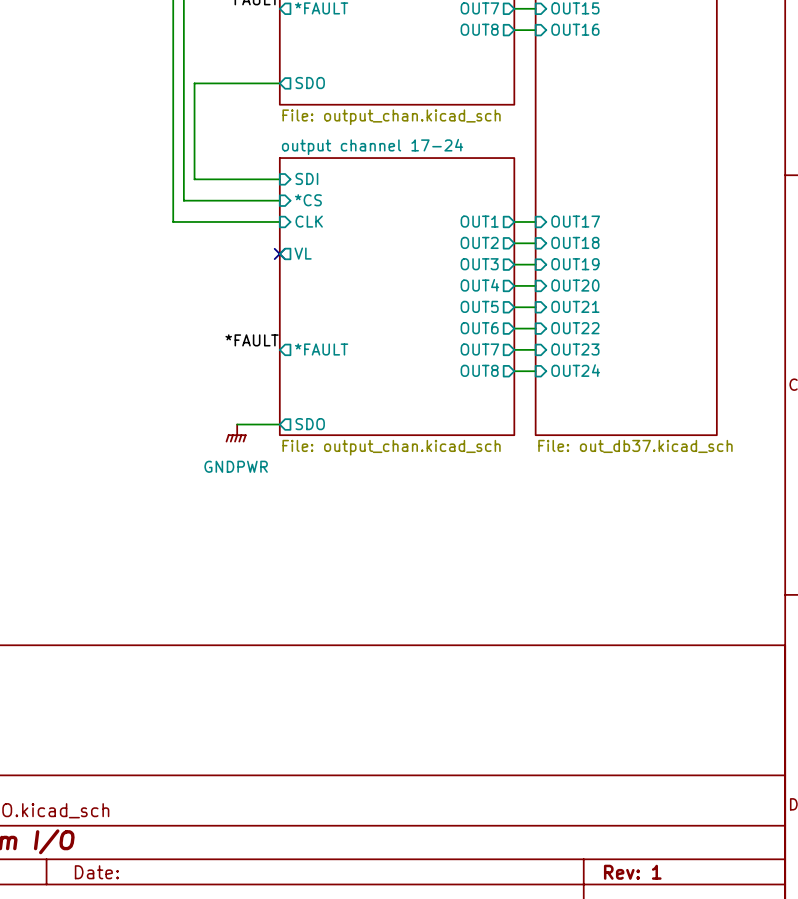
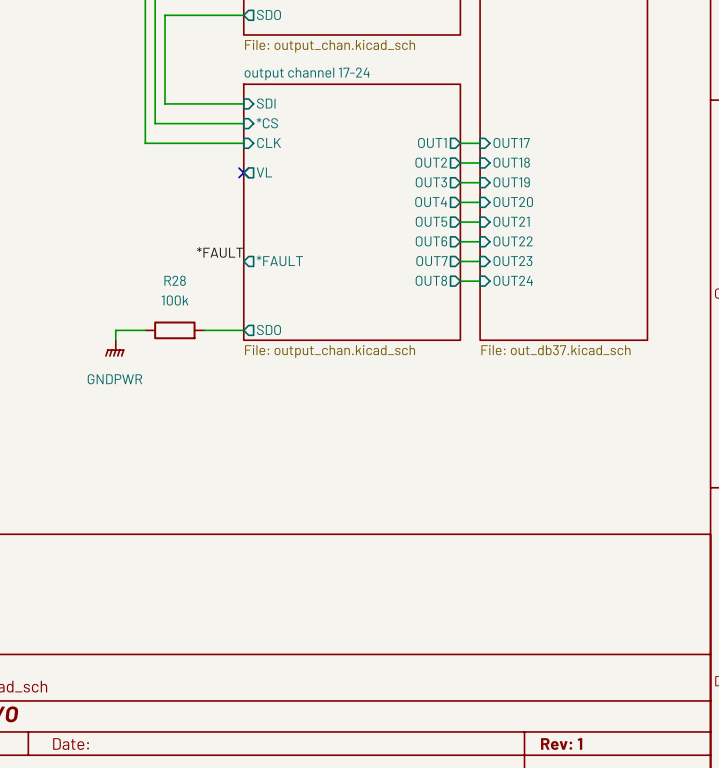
wire: none -> (145, 330) (115, 330) (115, 340)
R28: none -> 100k (174, 330)
power symbol position: GNDPWR (236, 433) -> GNDPWR (114, 348)

